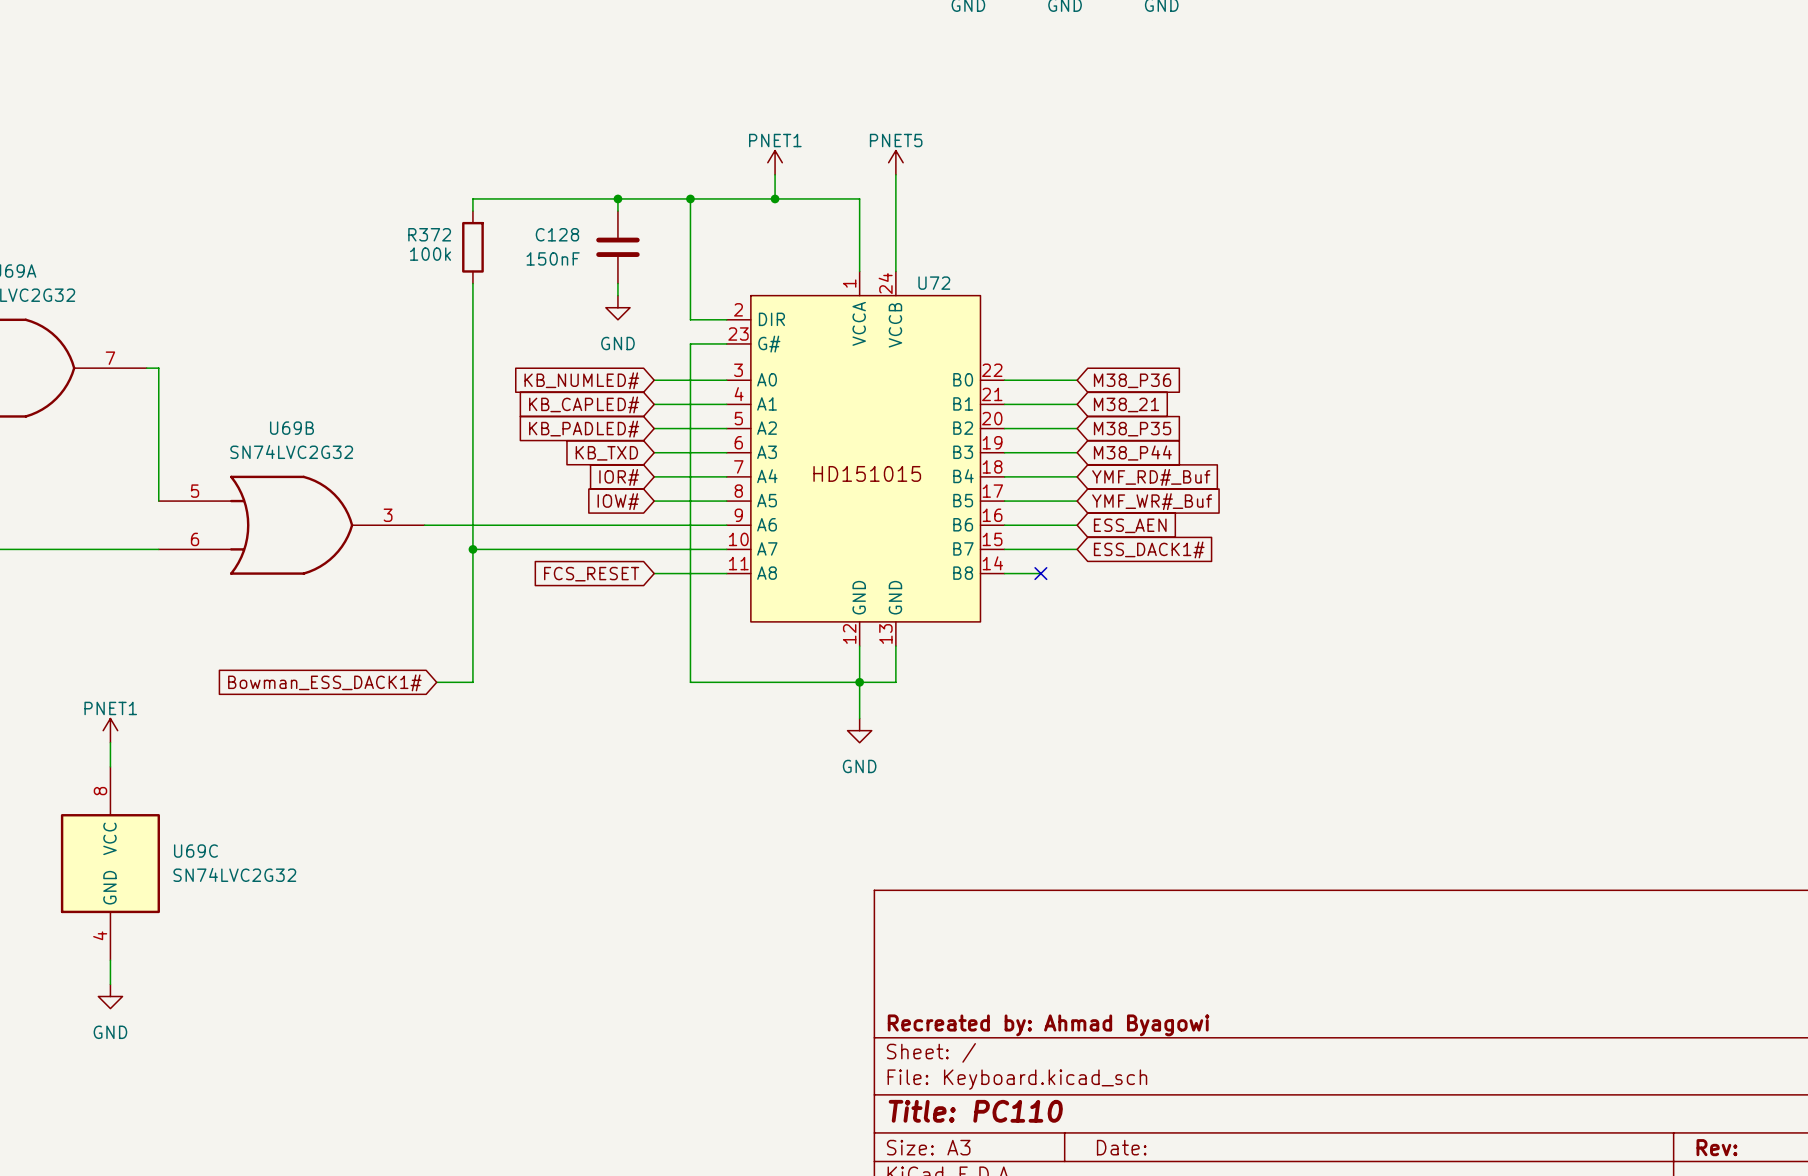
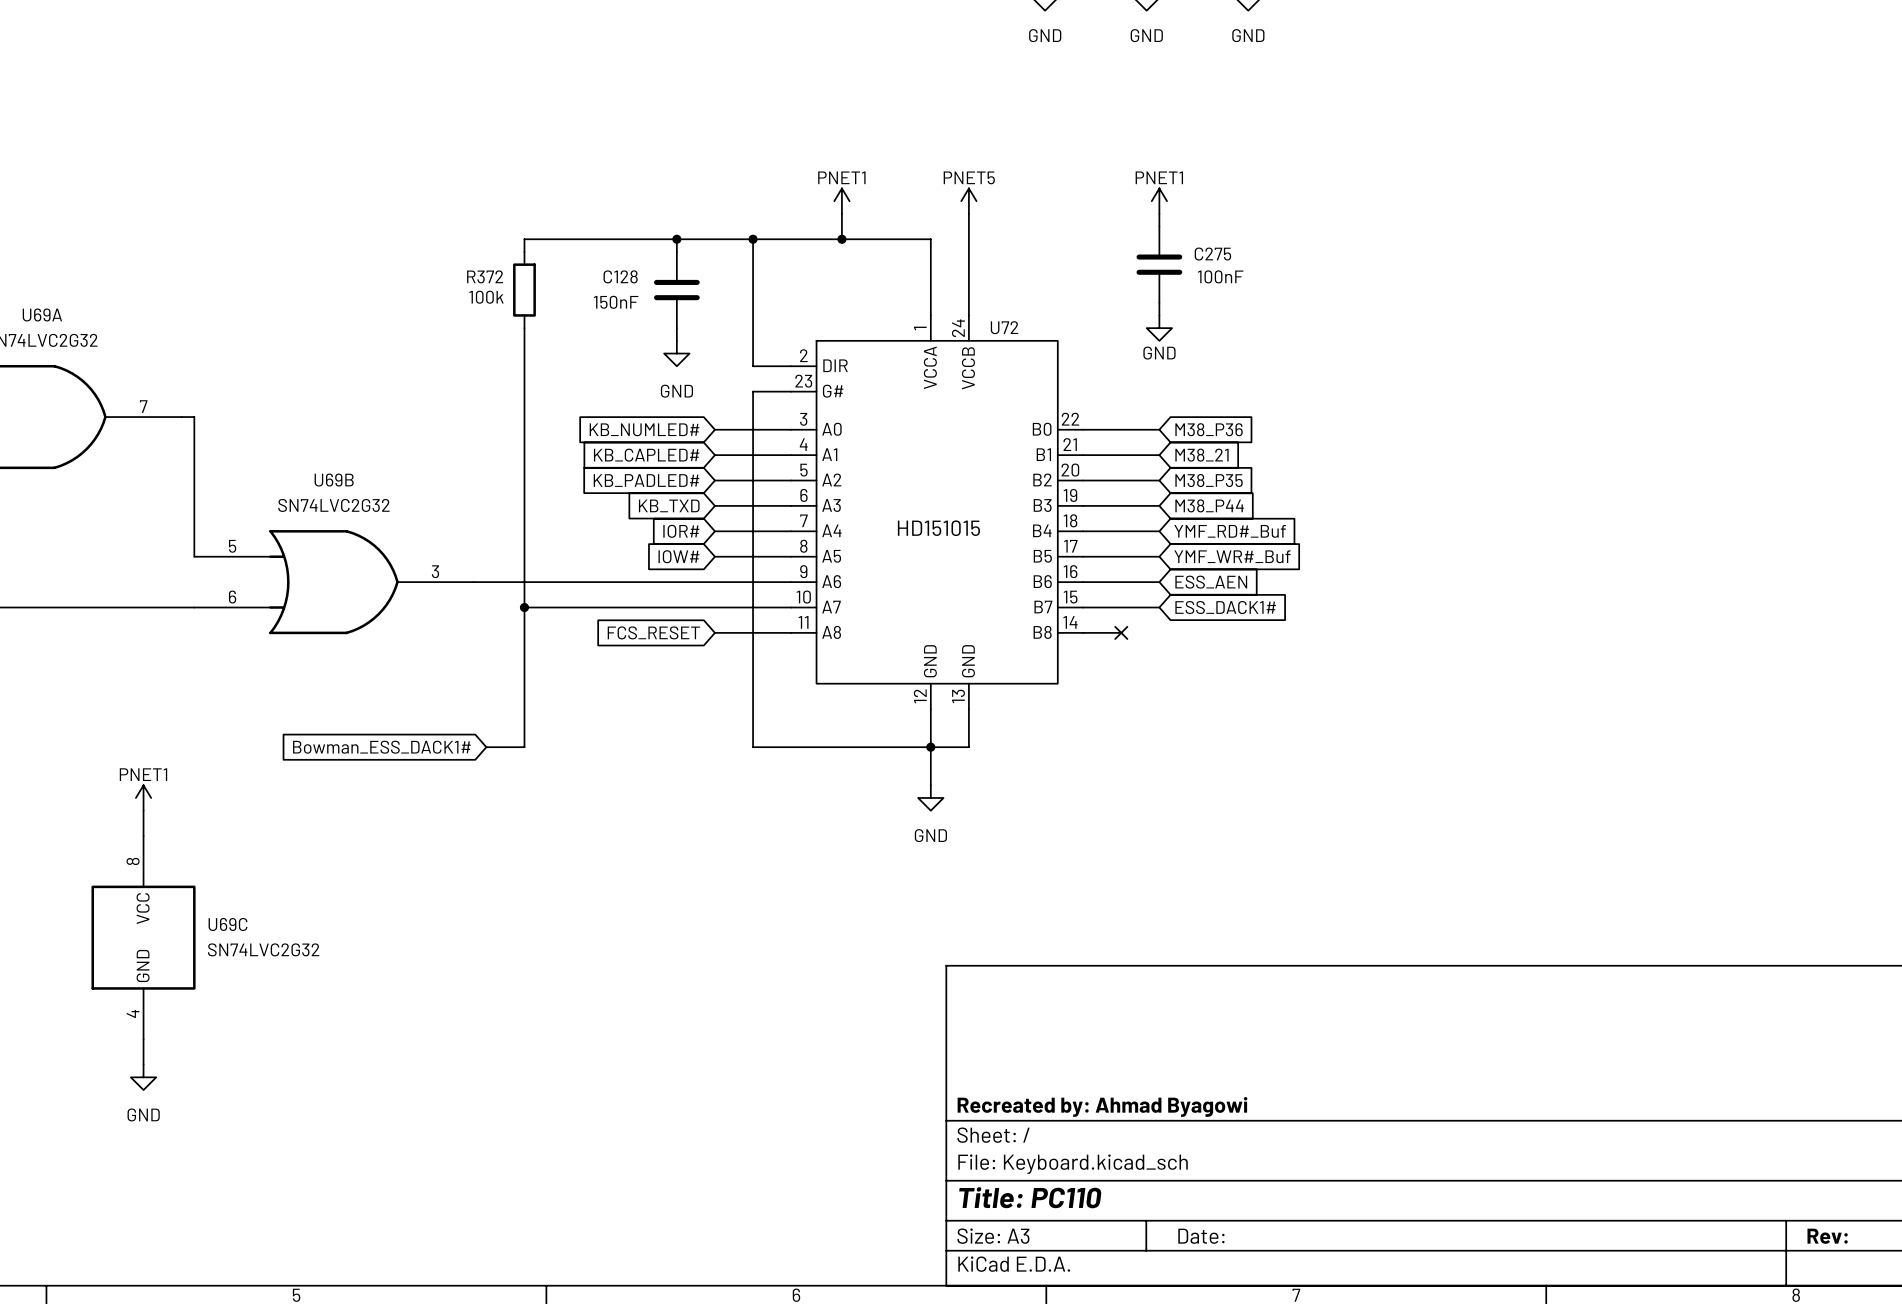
power symbol: none -> PNET1 (1159, 201)
wire: none -> (1159, 213) (1159, 226)
C275: none -> 100nF (1159, 264)
wire: none -> (1159, 302) (1159, 315)
power symbol: none -> GND (1159, 328)

